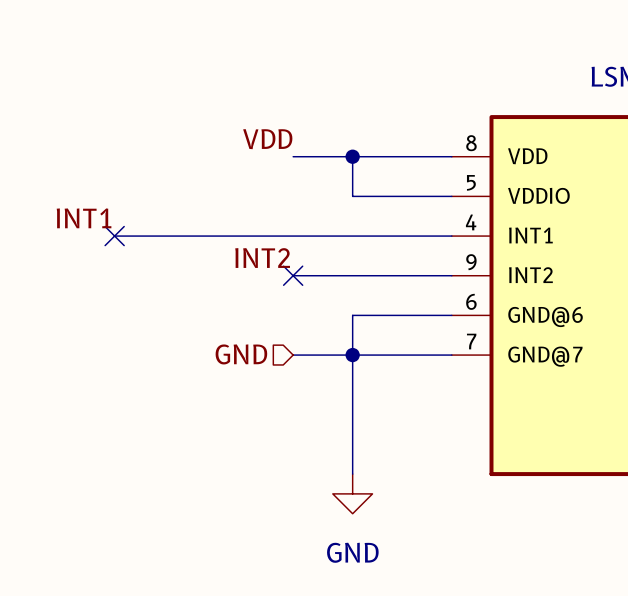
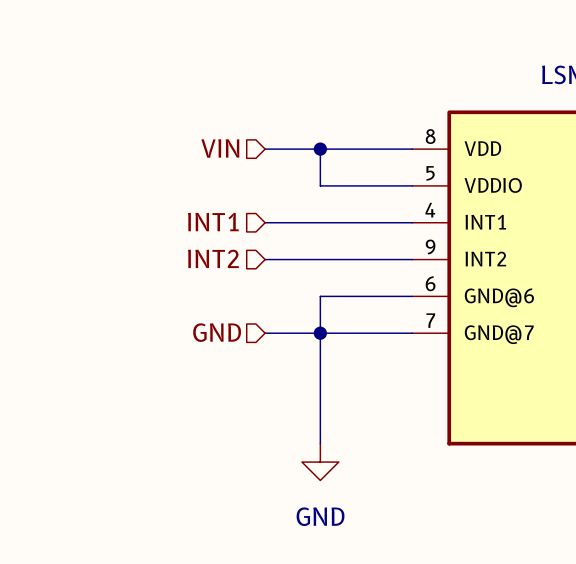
label: VDD (267, 139) -> none
hierarchical label: none -> VIN (220, 148)
label: INT1 (84, 218) -> none
hierarchical label: none -> INT1 (213, 222)
wire: (114, 236) (293, 236) -> none
no-connect mark: (114, 236) -> none
label: INT2 (262, 258) -> none
hierarchical label: none -> INT2 (213, 258)
no-connect mark: (293, 275) -> none

